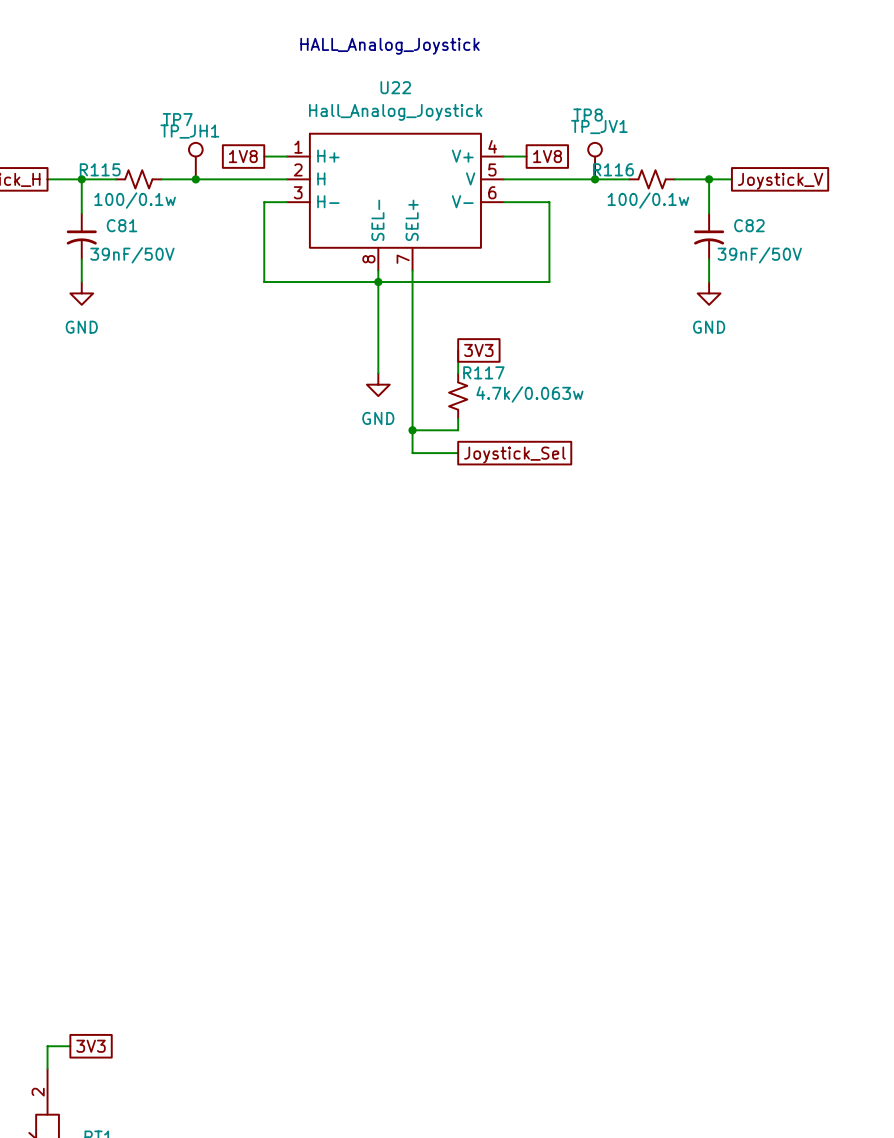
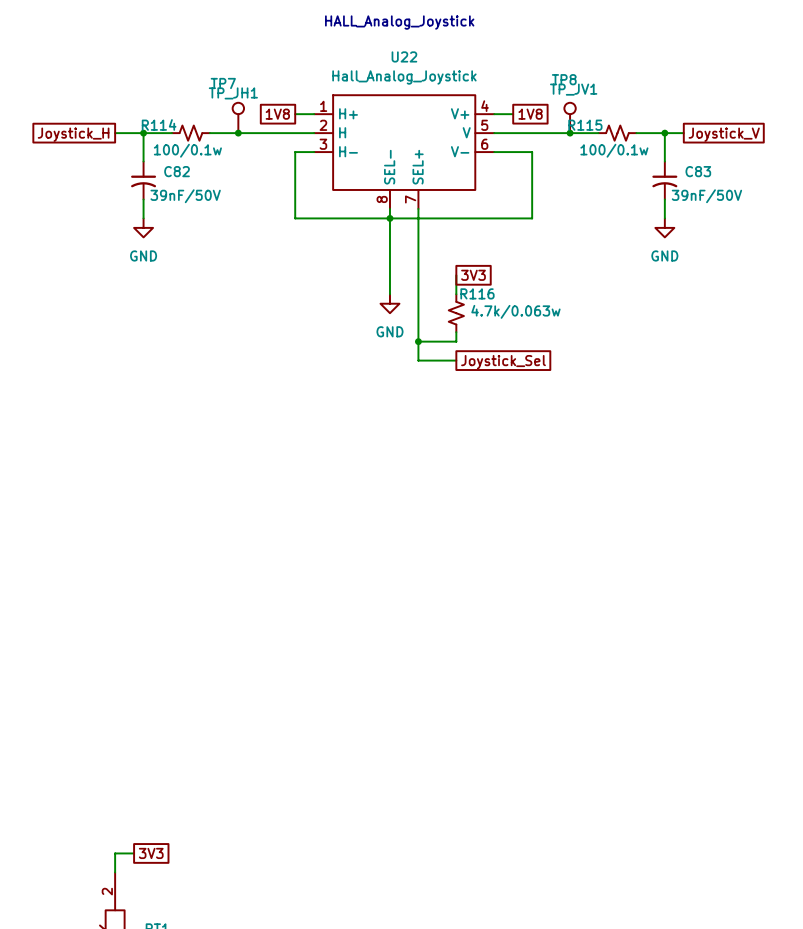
R115 name: R115 (100, 169) -> R114 (159, 124)
R116 name: R116 (613, 169) -> R115 (585, 125)
C81 name: C81 (122, 225) -> C82 (177, 171)
C82 name: C82 (749, 225) -> C83 (698, 171)
R117 name: R117 (483, 372) -> R116 (477, 293)

